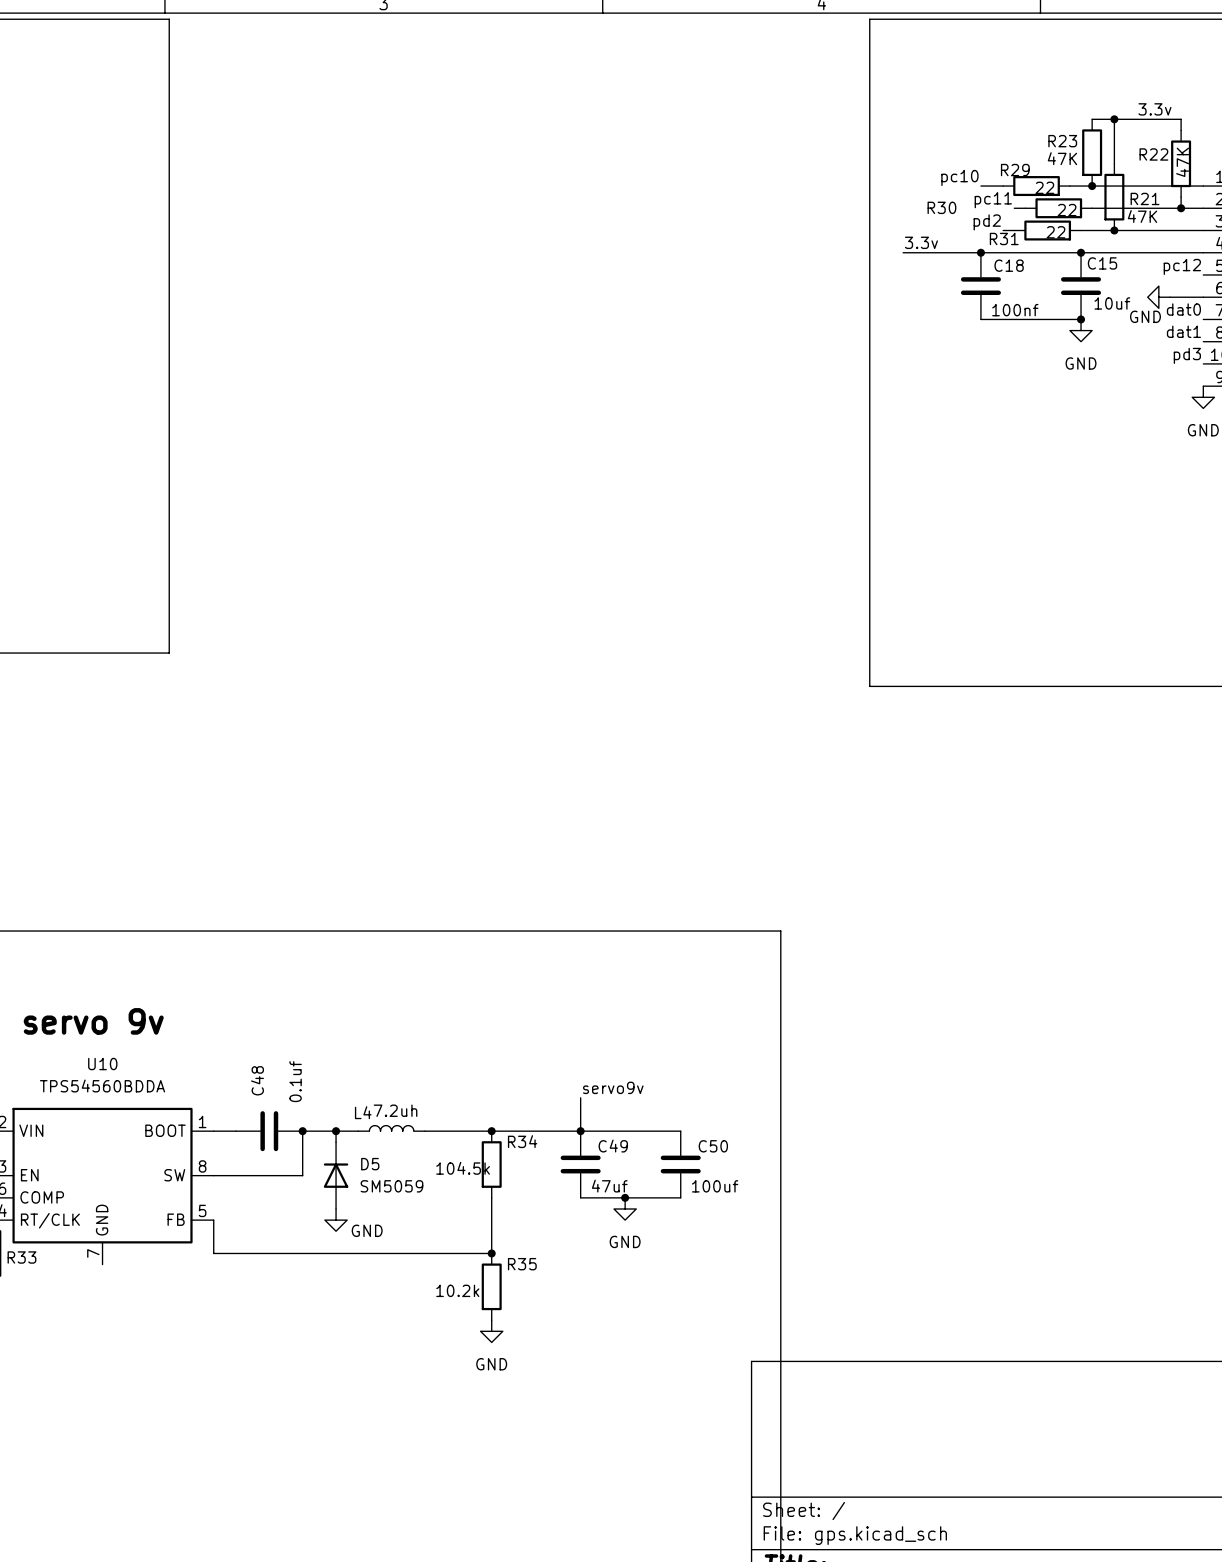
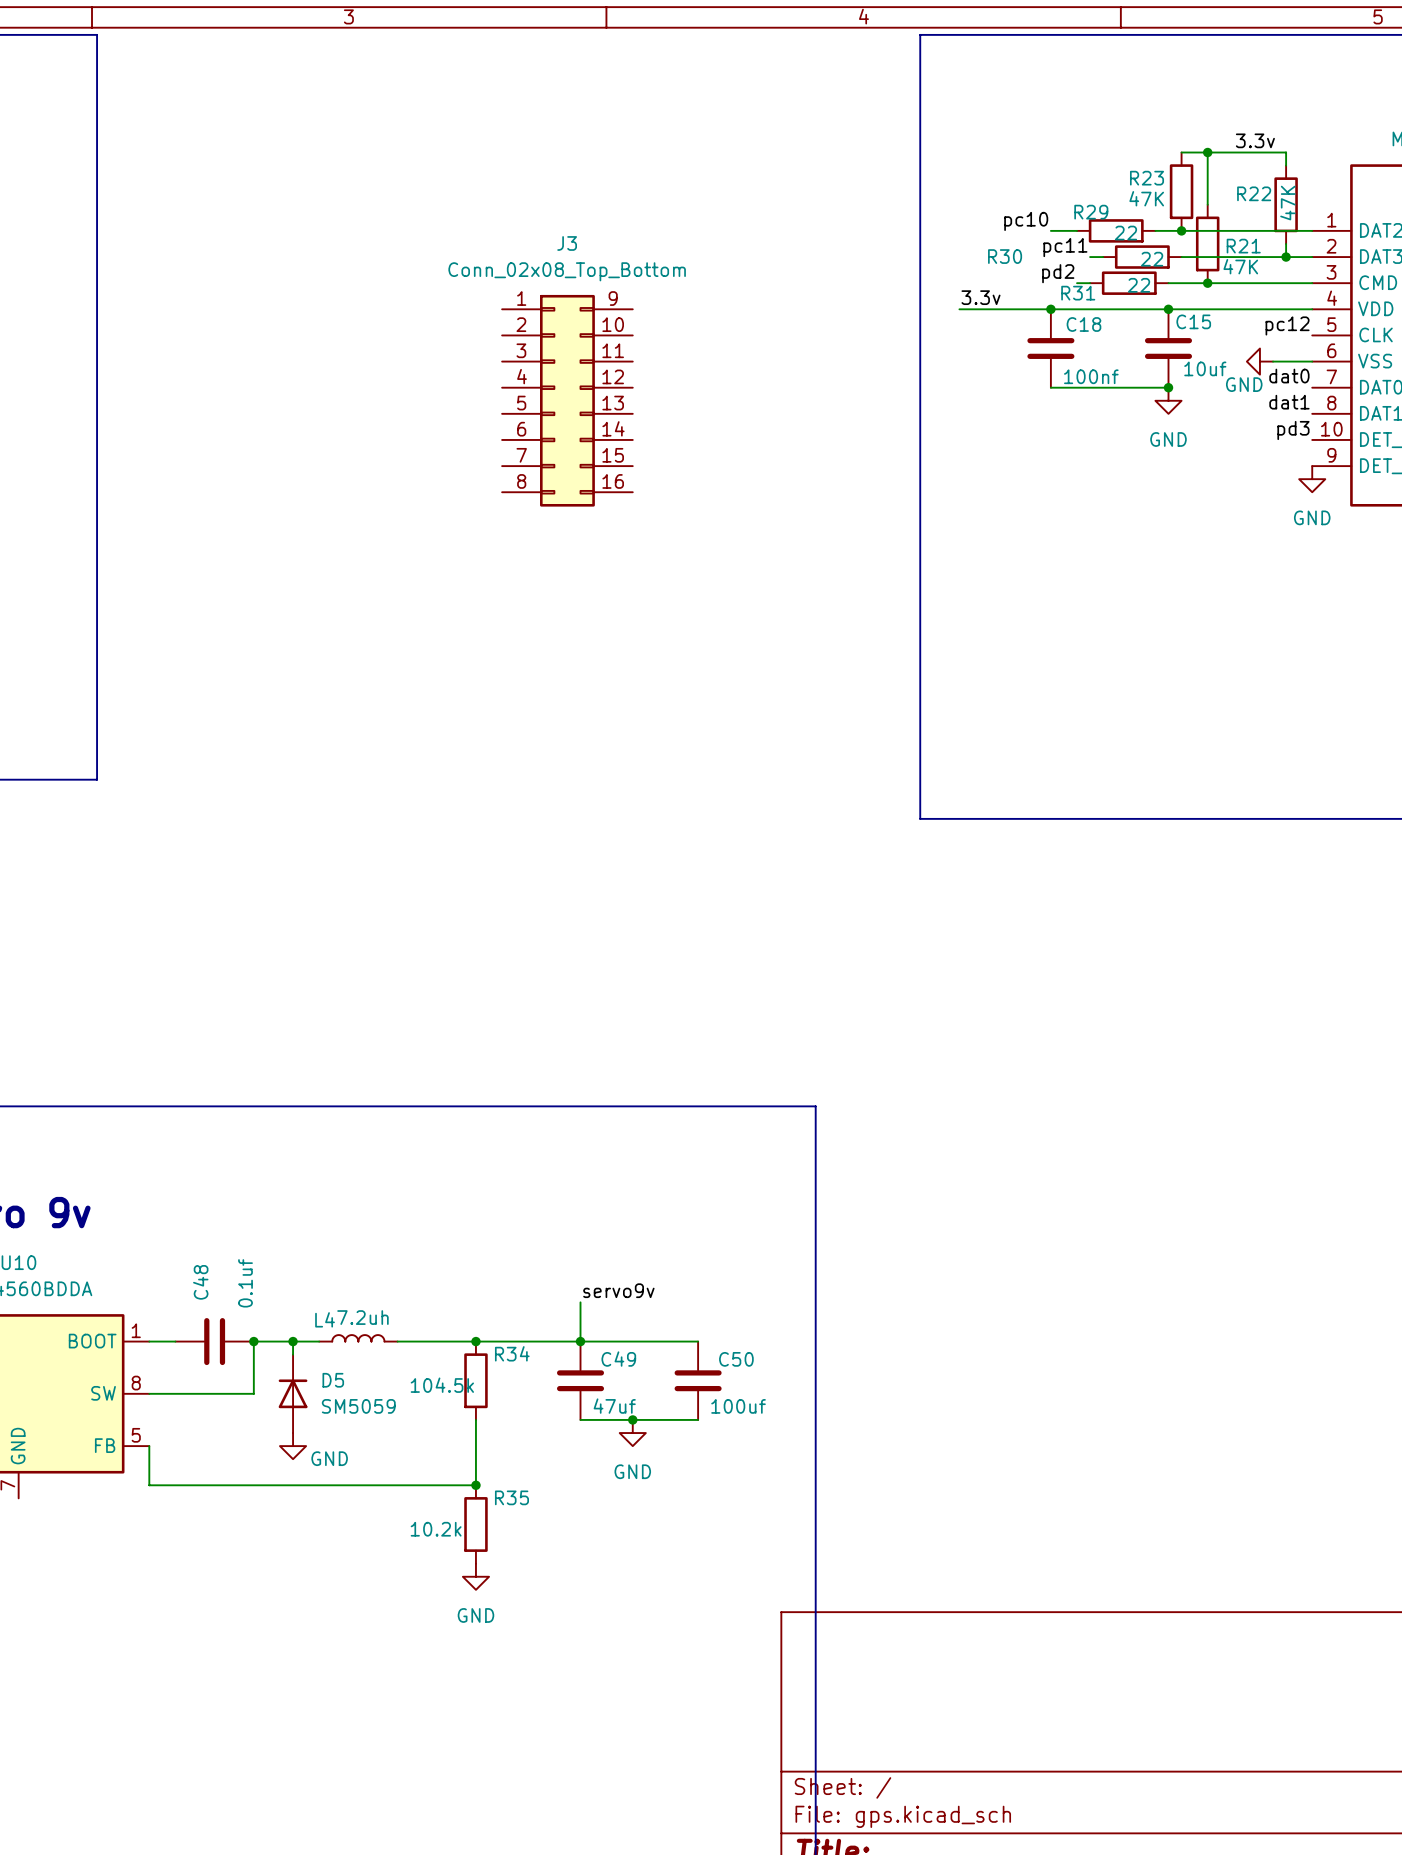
J3: none -> Conn_02x08_Top_Bottom (567, 400)

